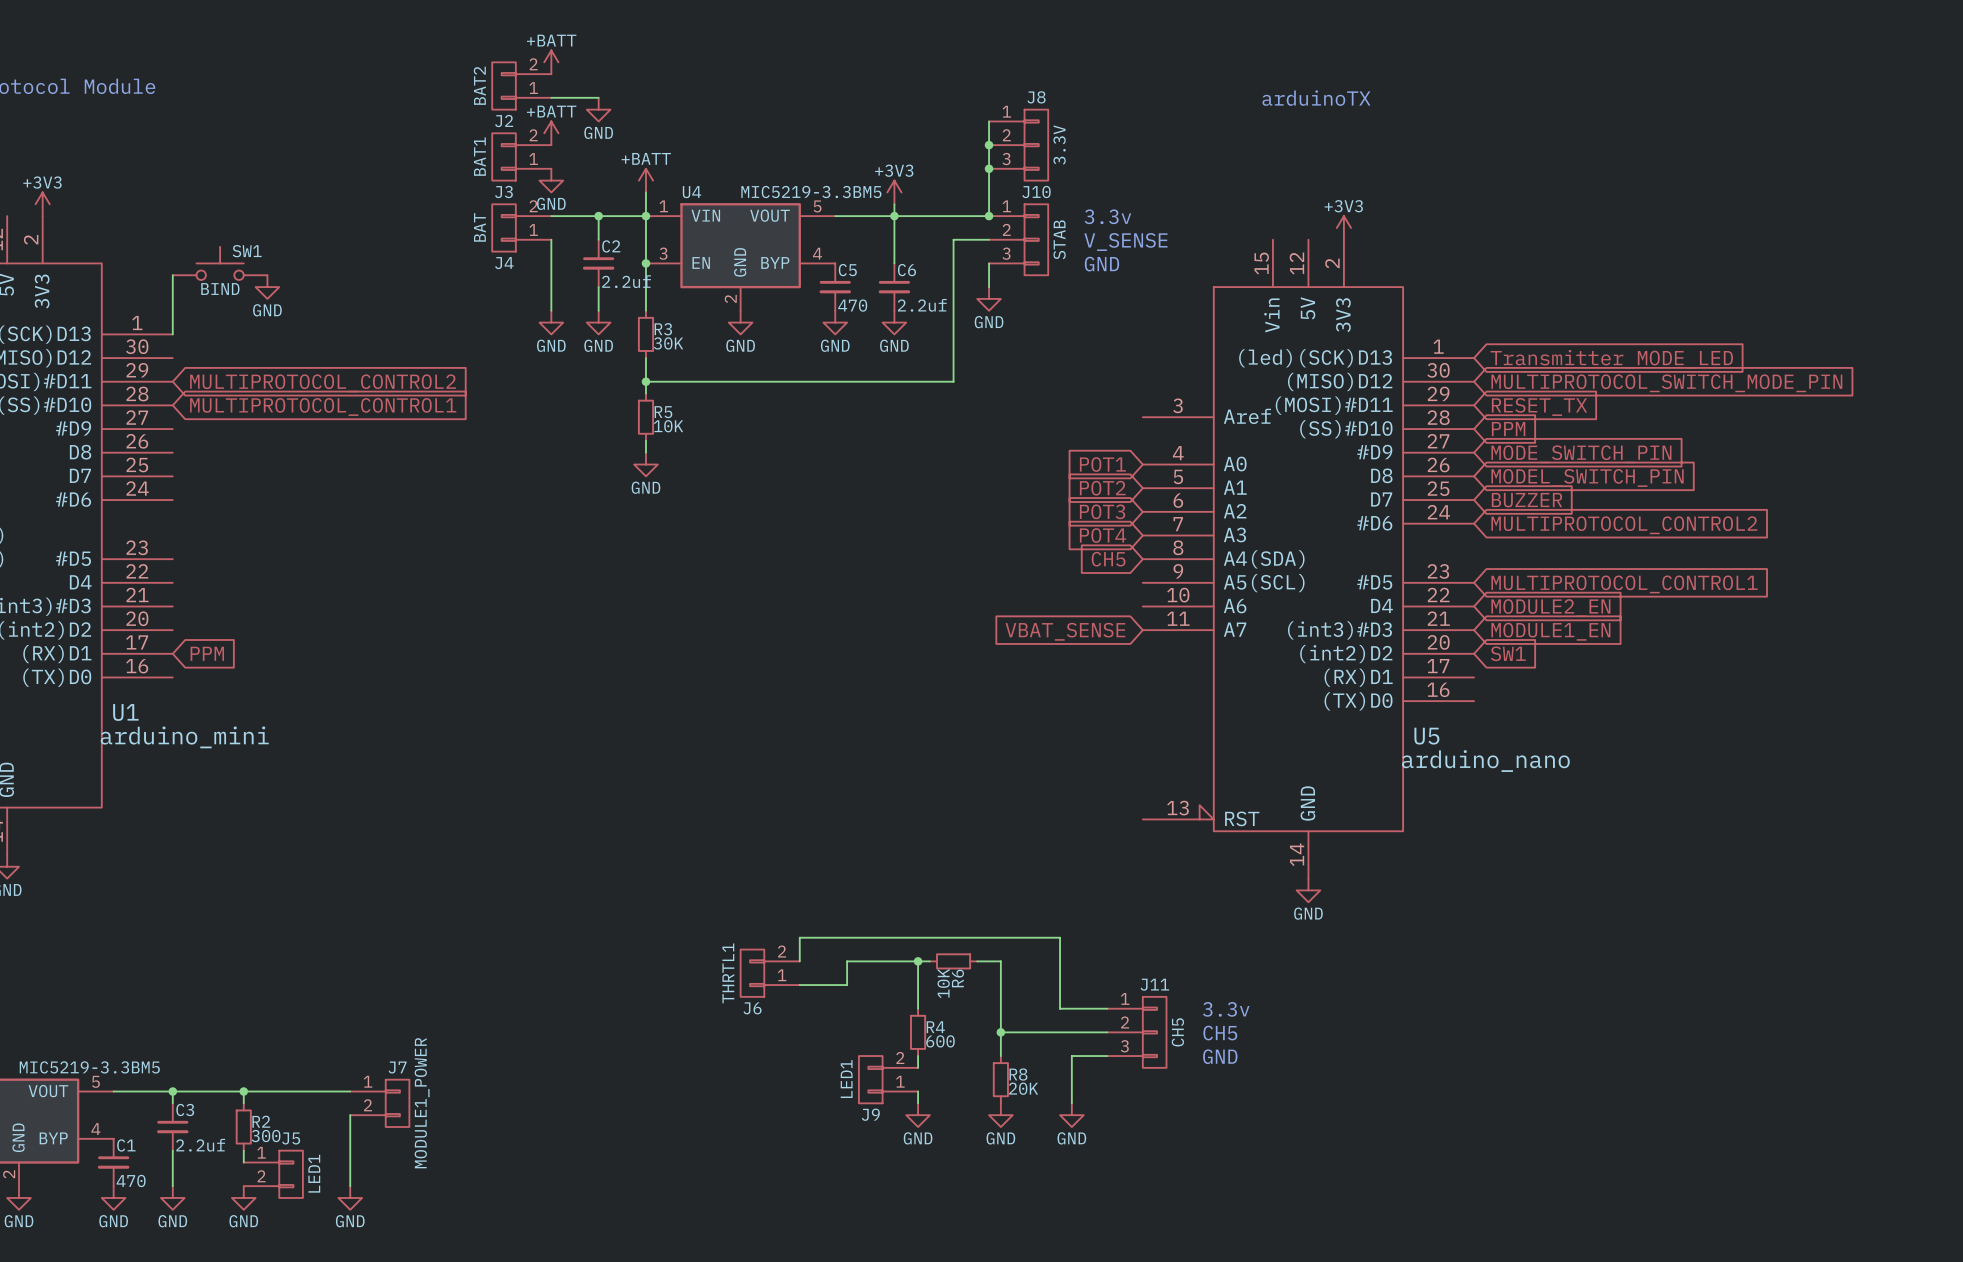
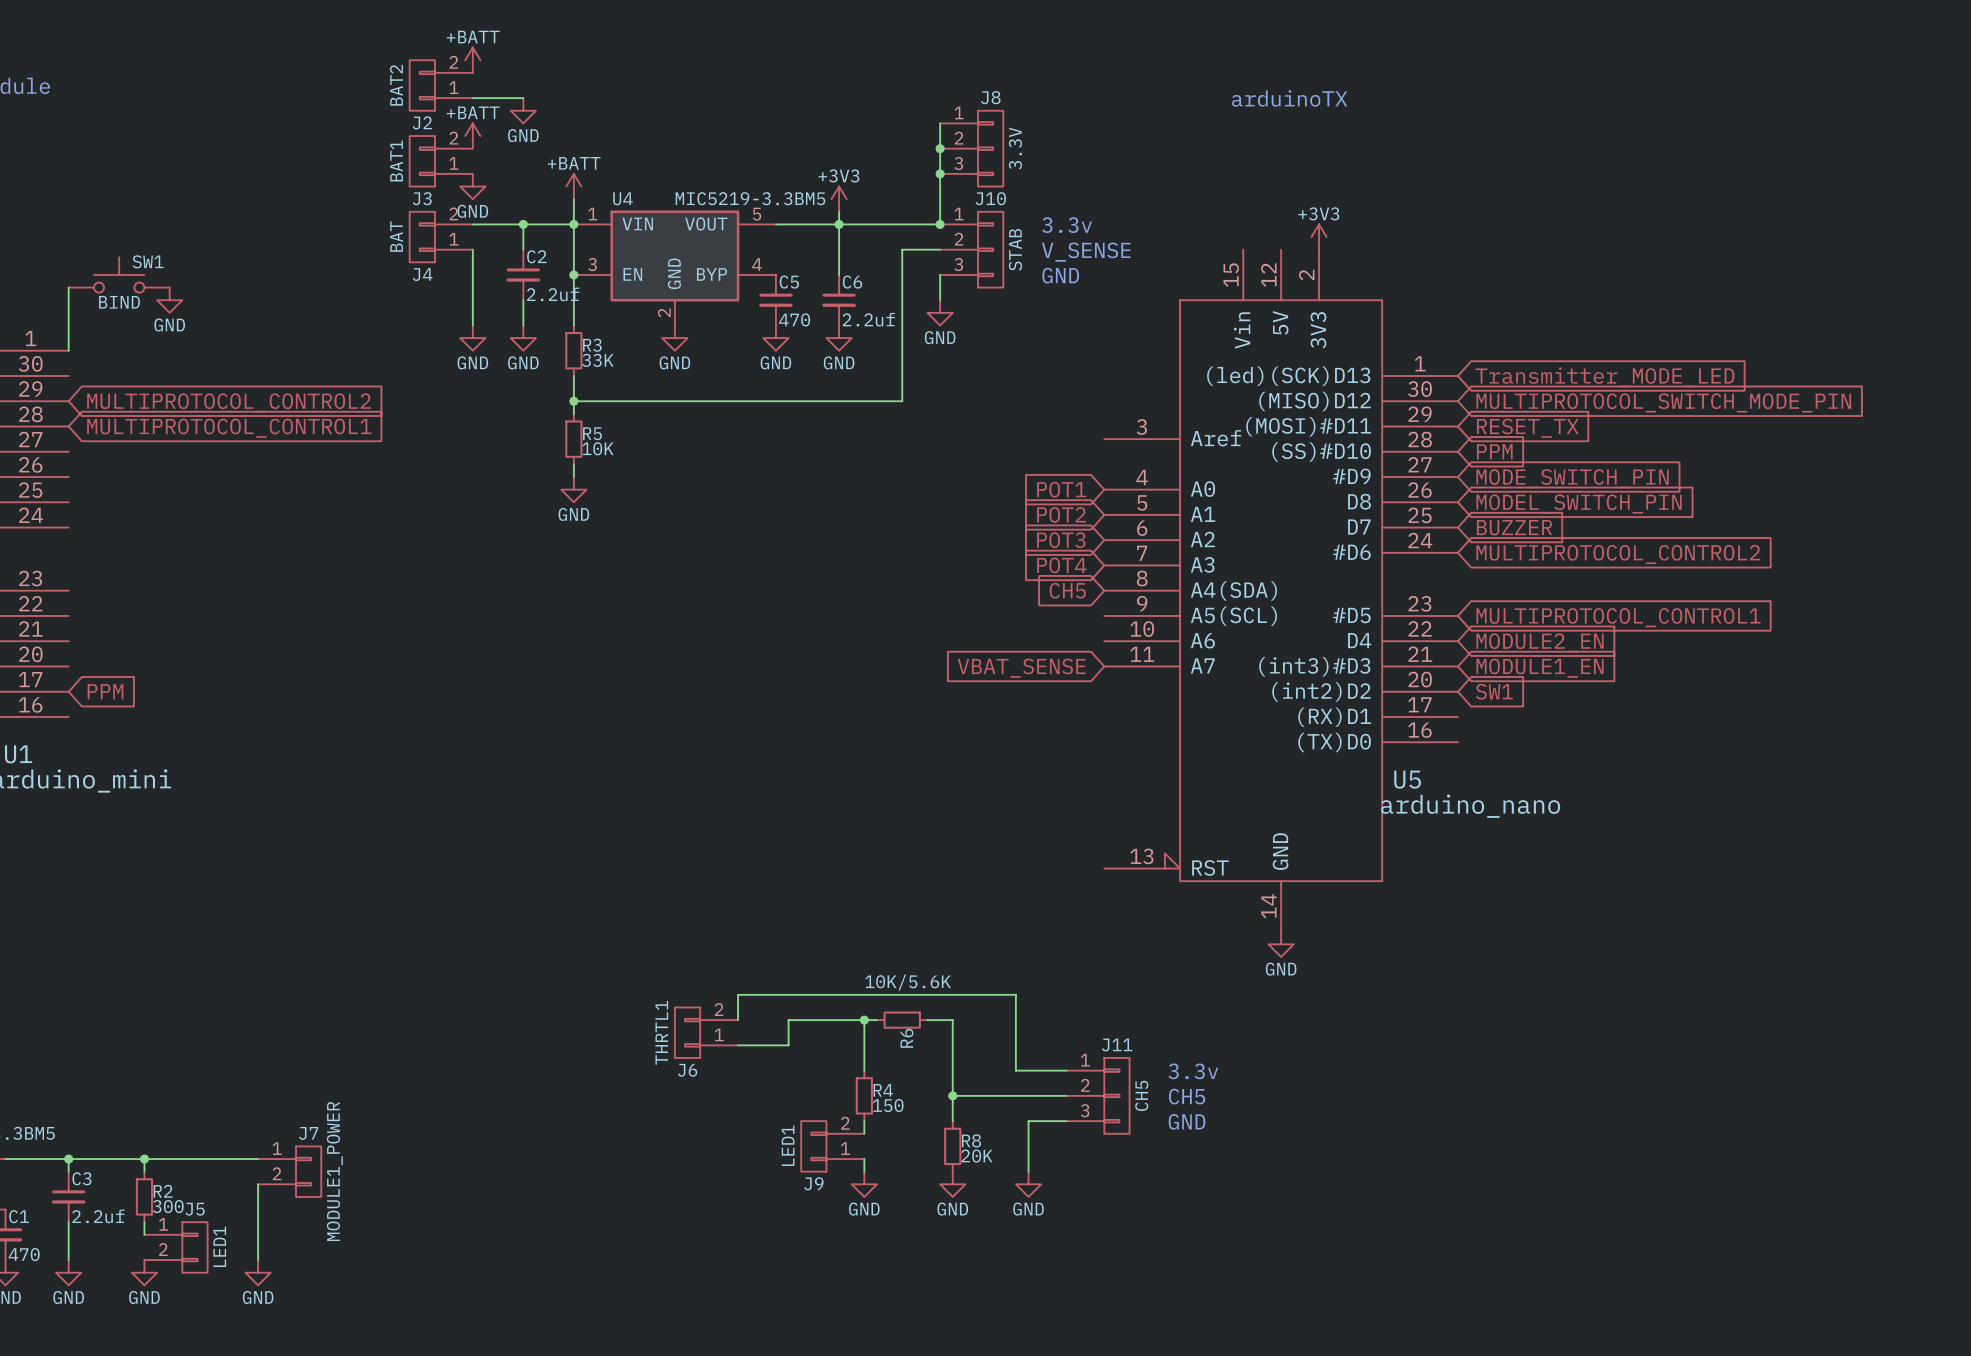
R3 value: 30K (668, 343) -> 33K (597, 360)
R6 value: 10K (943, 983) -> 10K/5.6K (908, 982)
R4 value: 600 (940, 1041) -> 150 (888, 1105)

